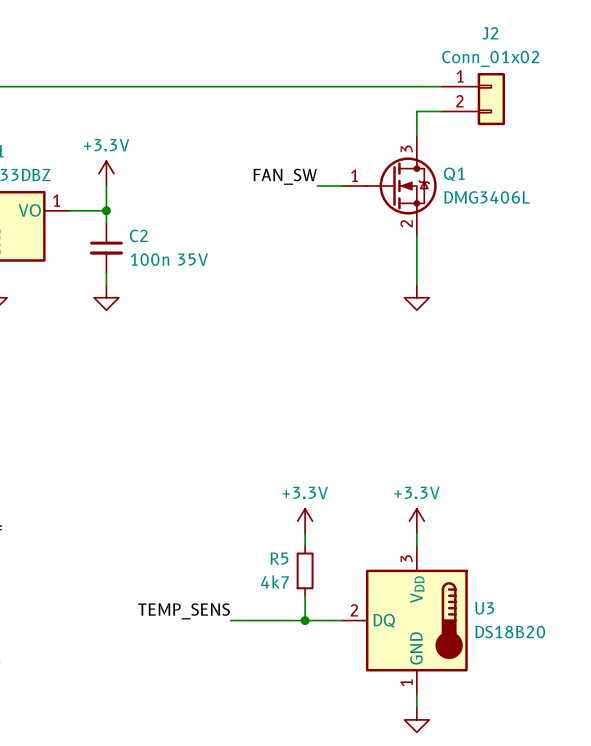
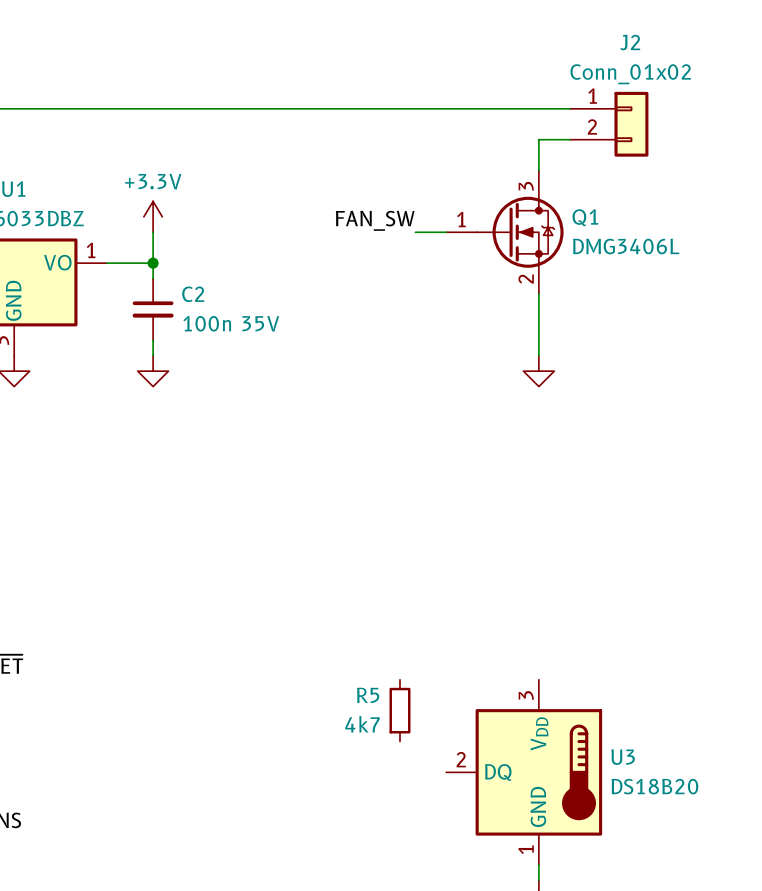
power symbol: +3.3V (305, 521) -> none
power symbol: +3.3V (416, 521) -> none
wire: (305, 533) (305, 546) -> none
wire: (416, 533) (416, 546) -> none
wire: (305, 595) (305, 620) -> none
label: TEMP_SENS (183, 611) -> none
wire: (230, 620) (342, 620) -> none
junction: (305, 620) -> none

